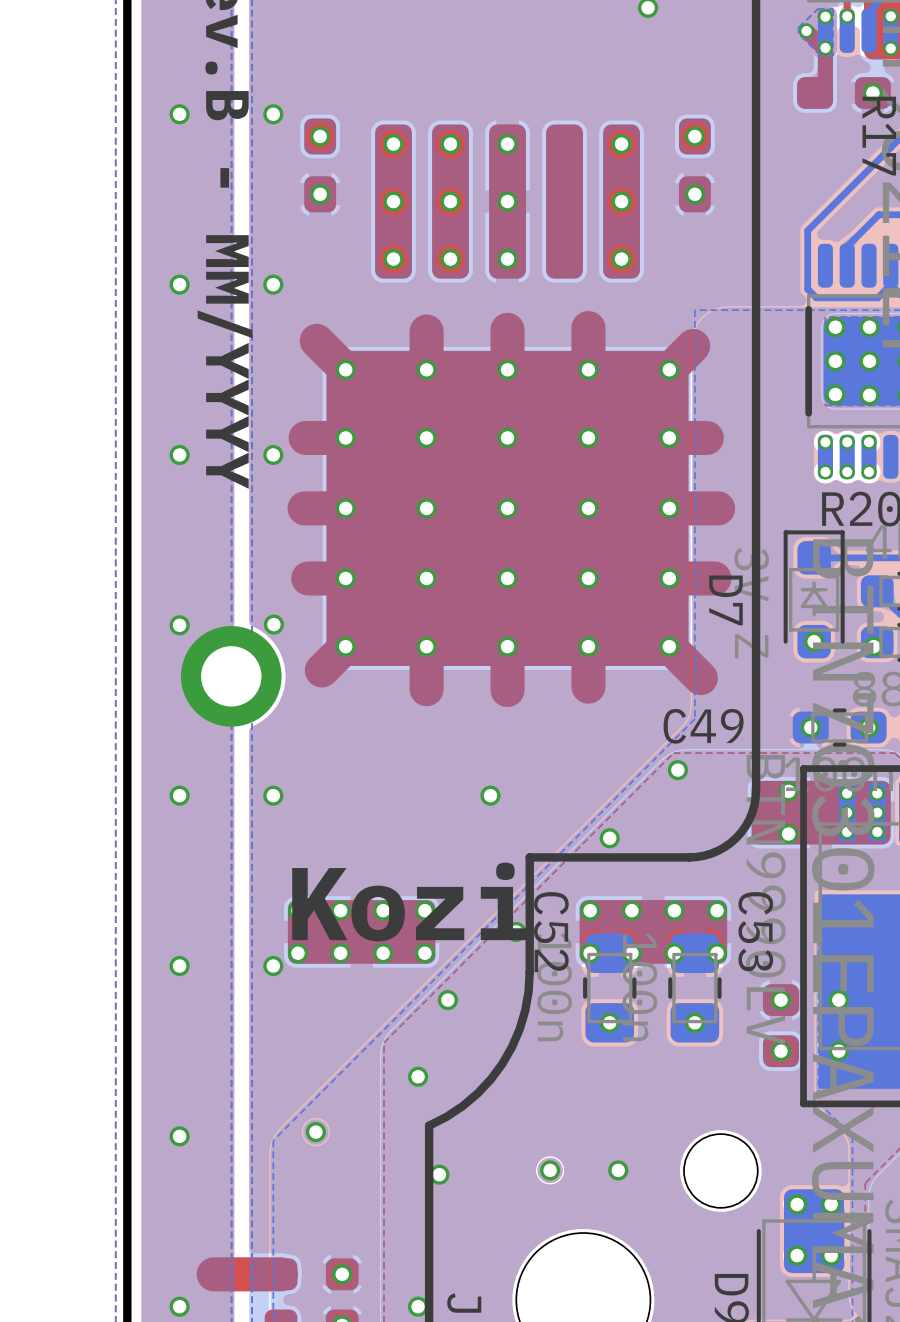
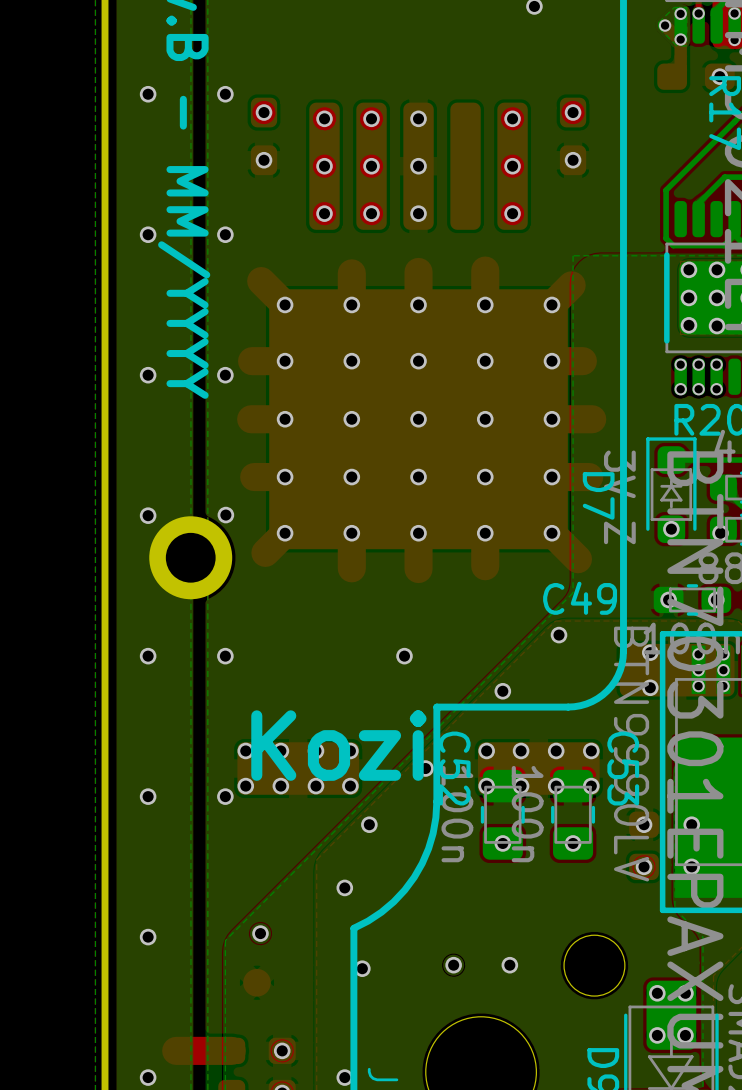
part: none -> (256, 982)

